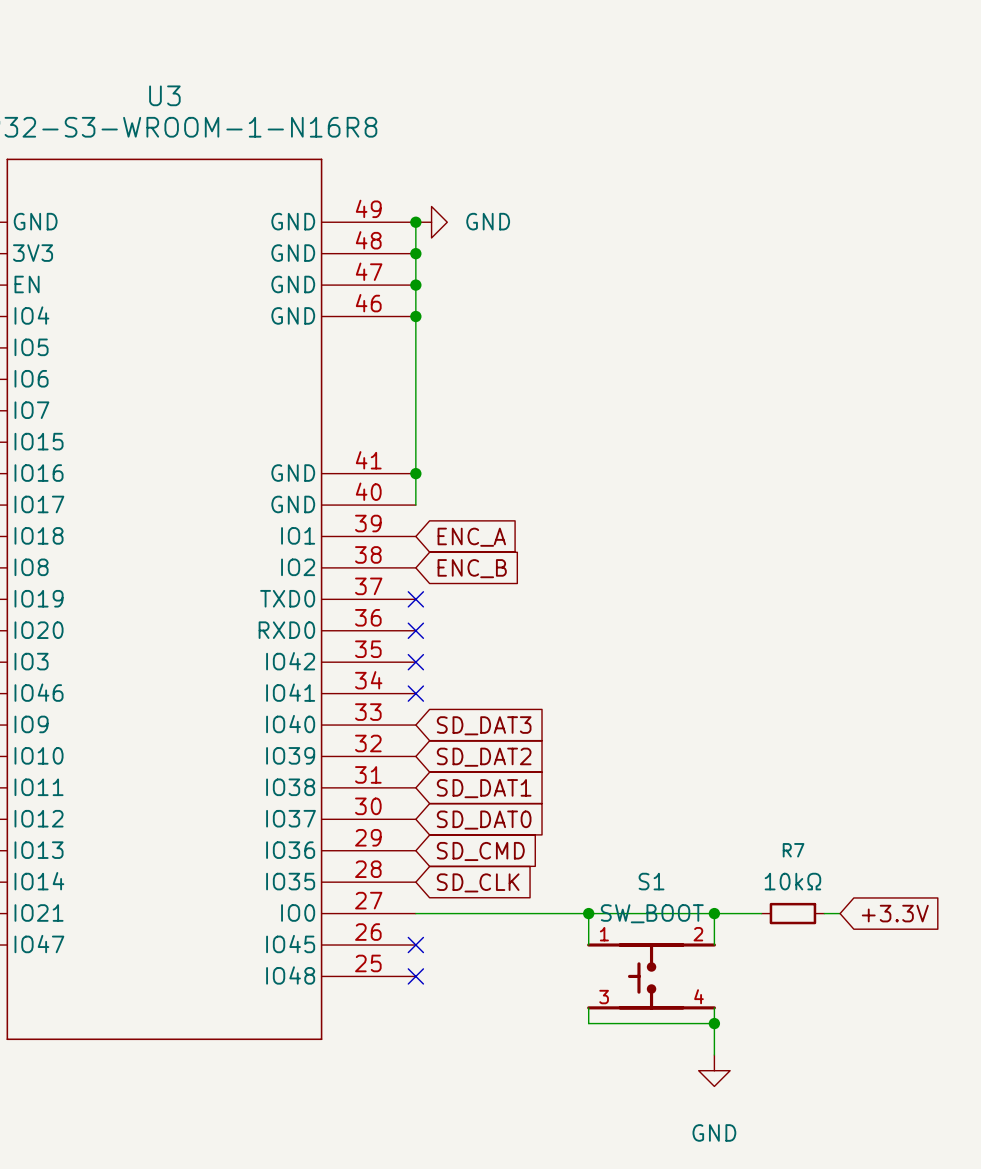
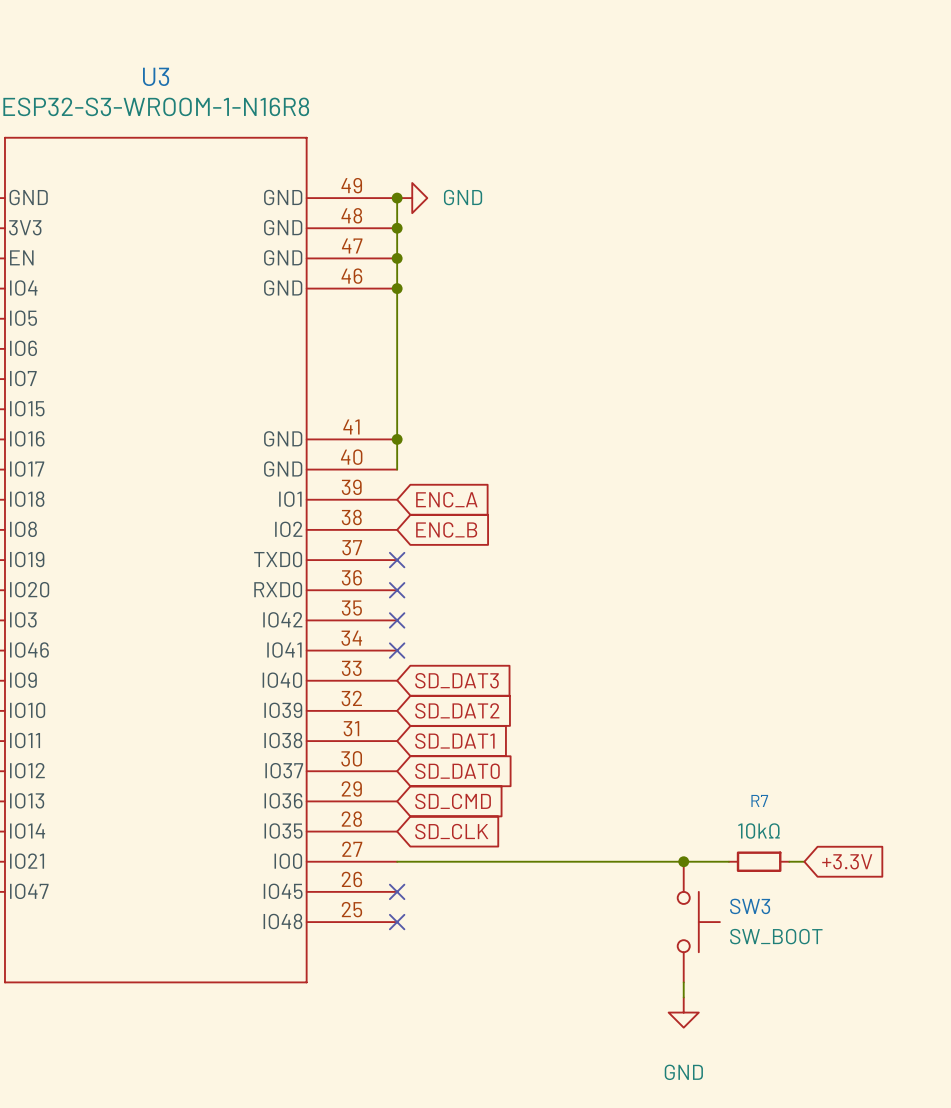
wire: (588, 913) (588, 945) -> none
junction: (588, 913) -> none
S1: SW_BOOT (651, 976) -> none
SW3: none -> SW_BOOT (698, 922)
wire: (588, 1007) (588, 1023) (714, 1023) -> none
junction: (714, 1023) -> none

